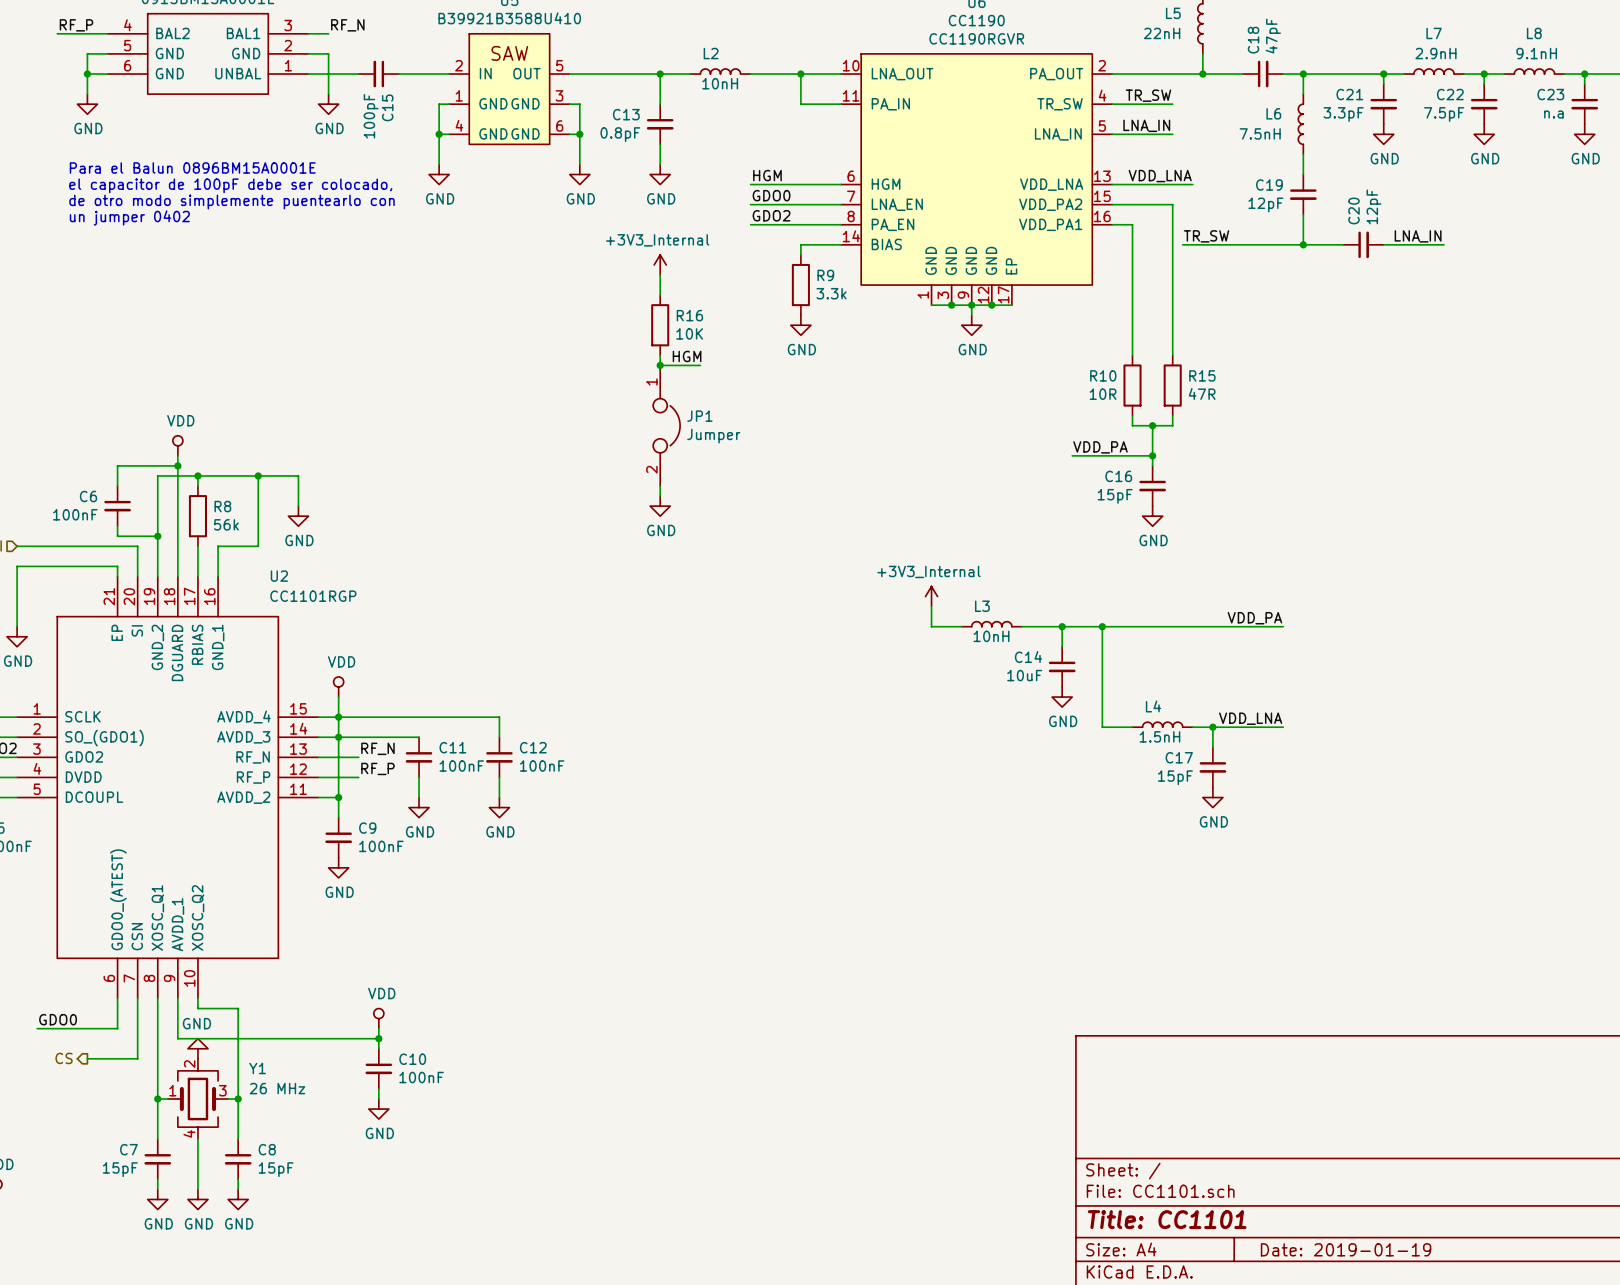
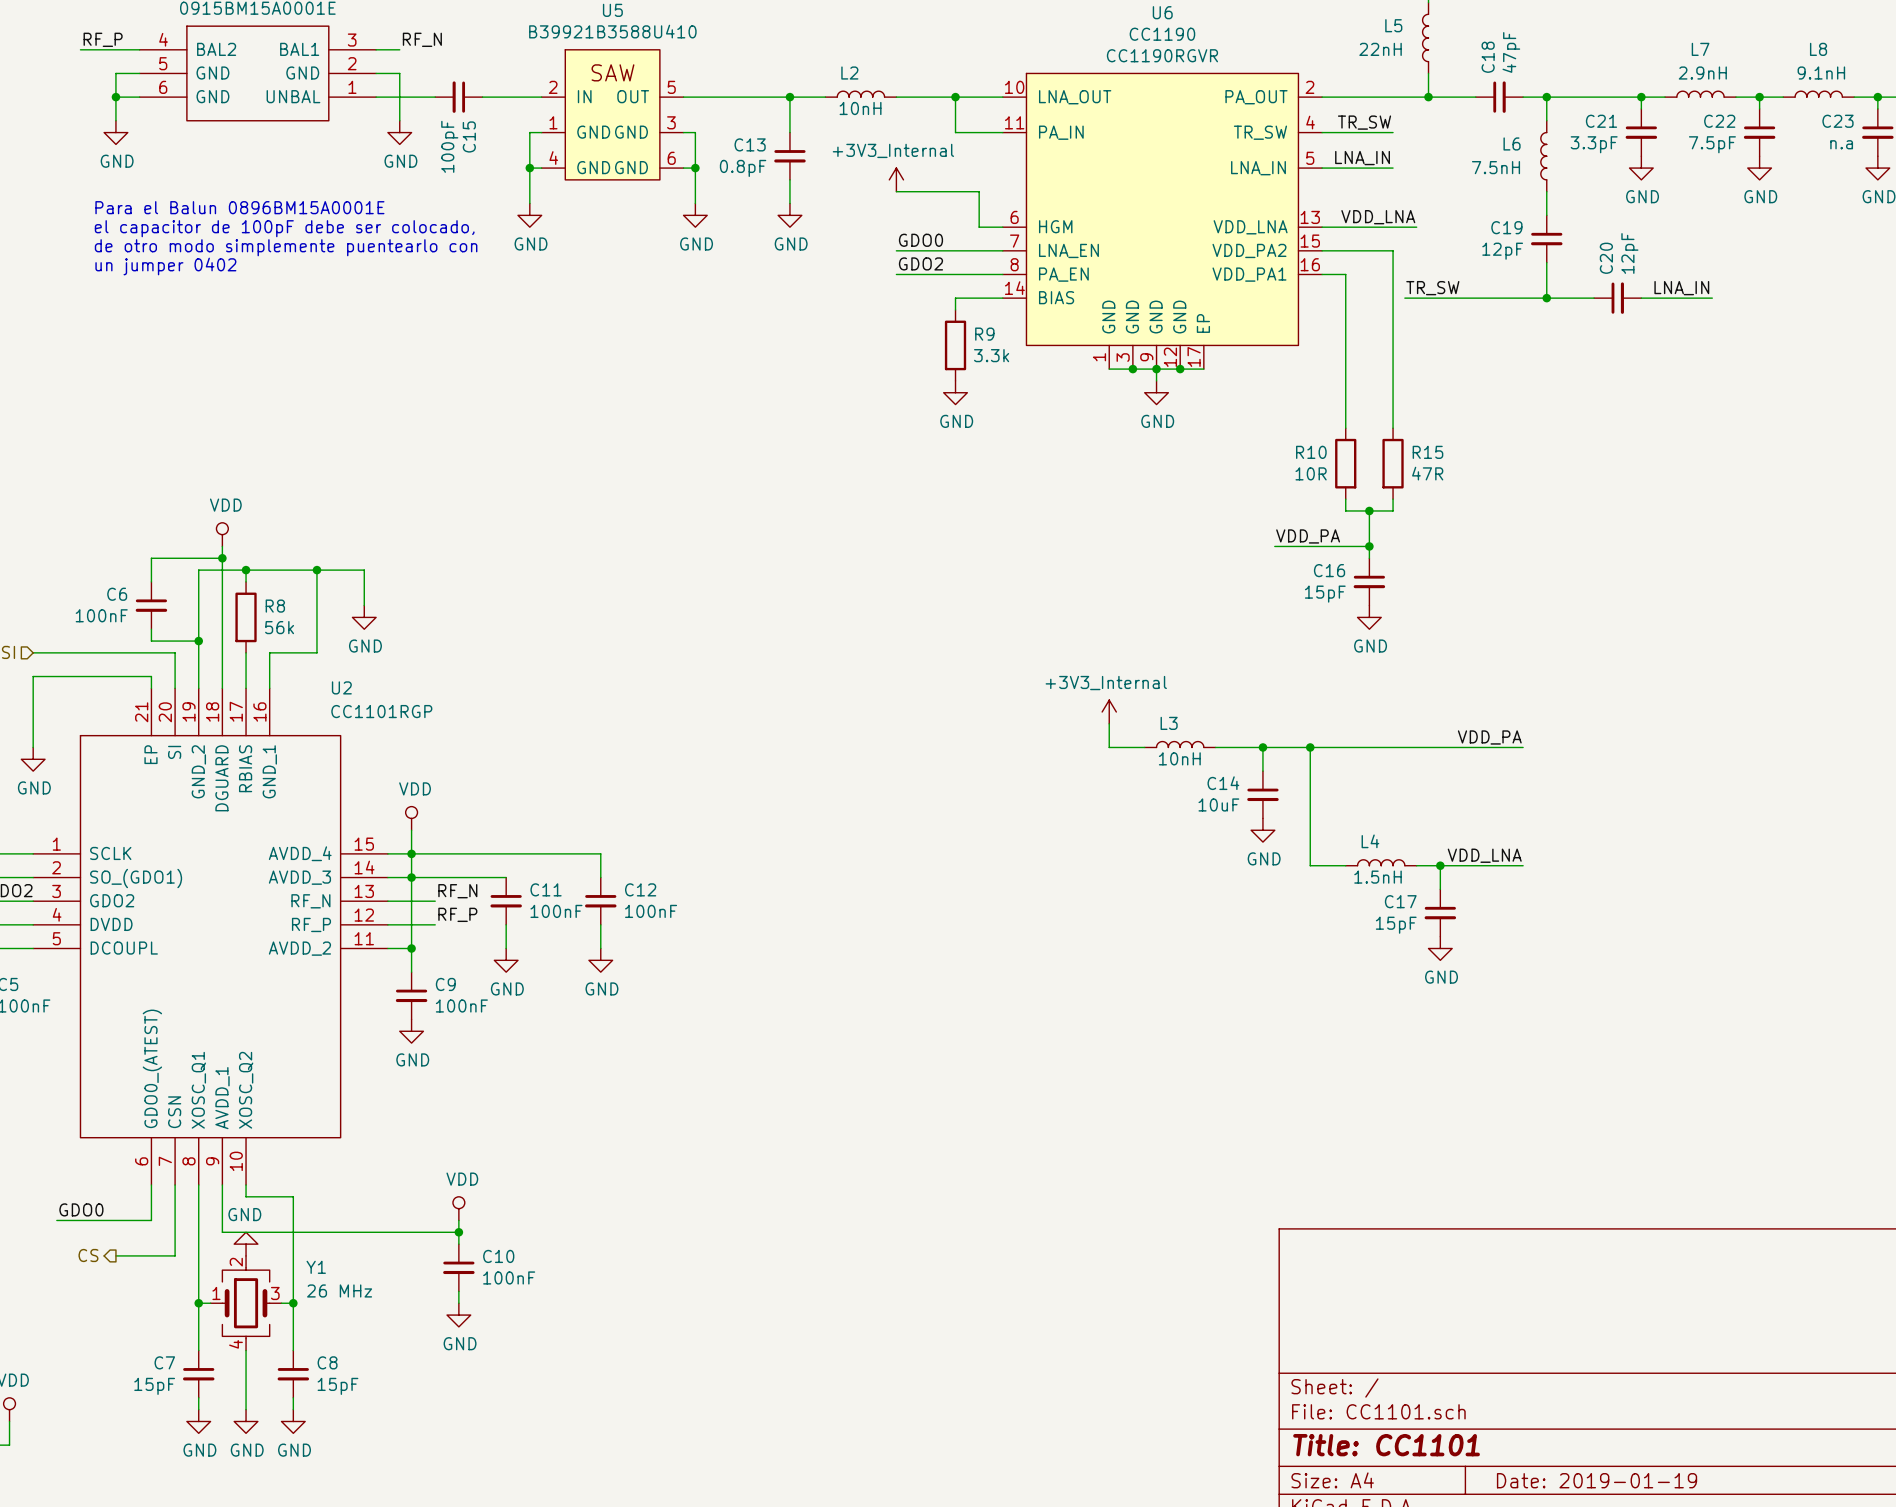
label: HGM (767, 175) -> none
wire: (750, 184) (820, 184) -> (896, 191) (979, 191) (979, 227)
power symbol position: +3V3_Internal (660, 264) -> +3V3_Internal (896, 179)
wire: (660, 274) (660, 295) -> none
R16: 10K (660, 325) -> none
wire: (660, 355) (660, 365) (700, 365) -> none
label: HGM (687, 356) -> none
junction: (660, 365) -> none
JP1: Jumper (666, 425) -> none
wire: (660, 486) (660, 496) -> none
power symbol: GND (660, 506) -> none

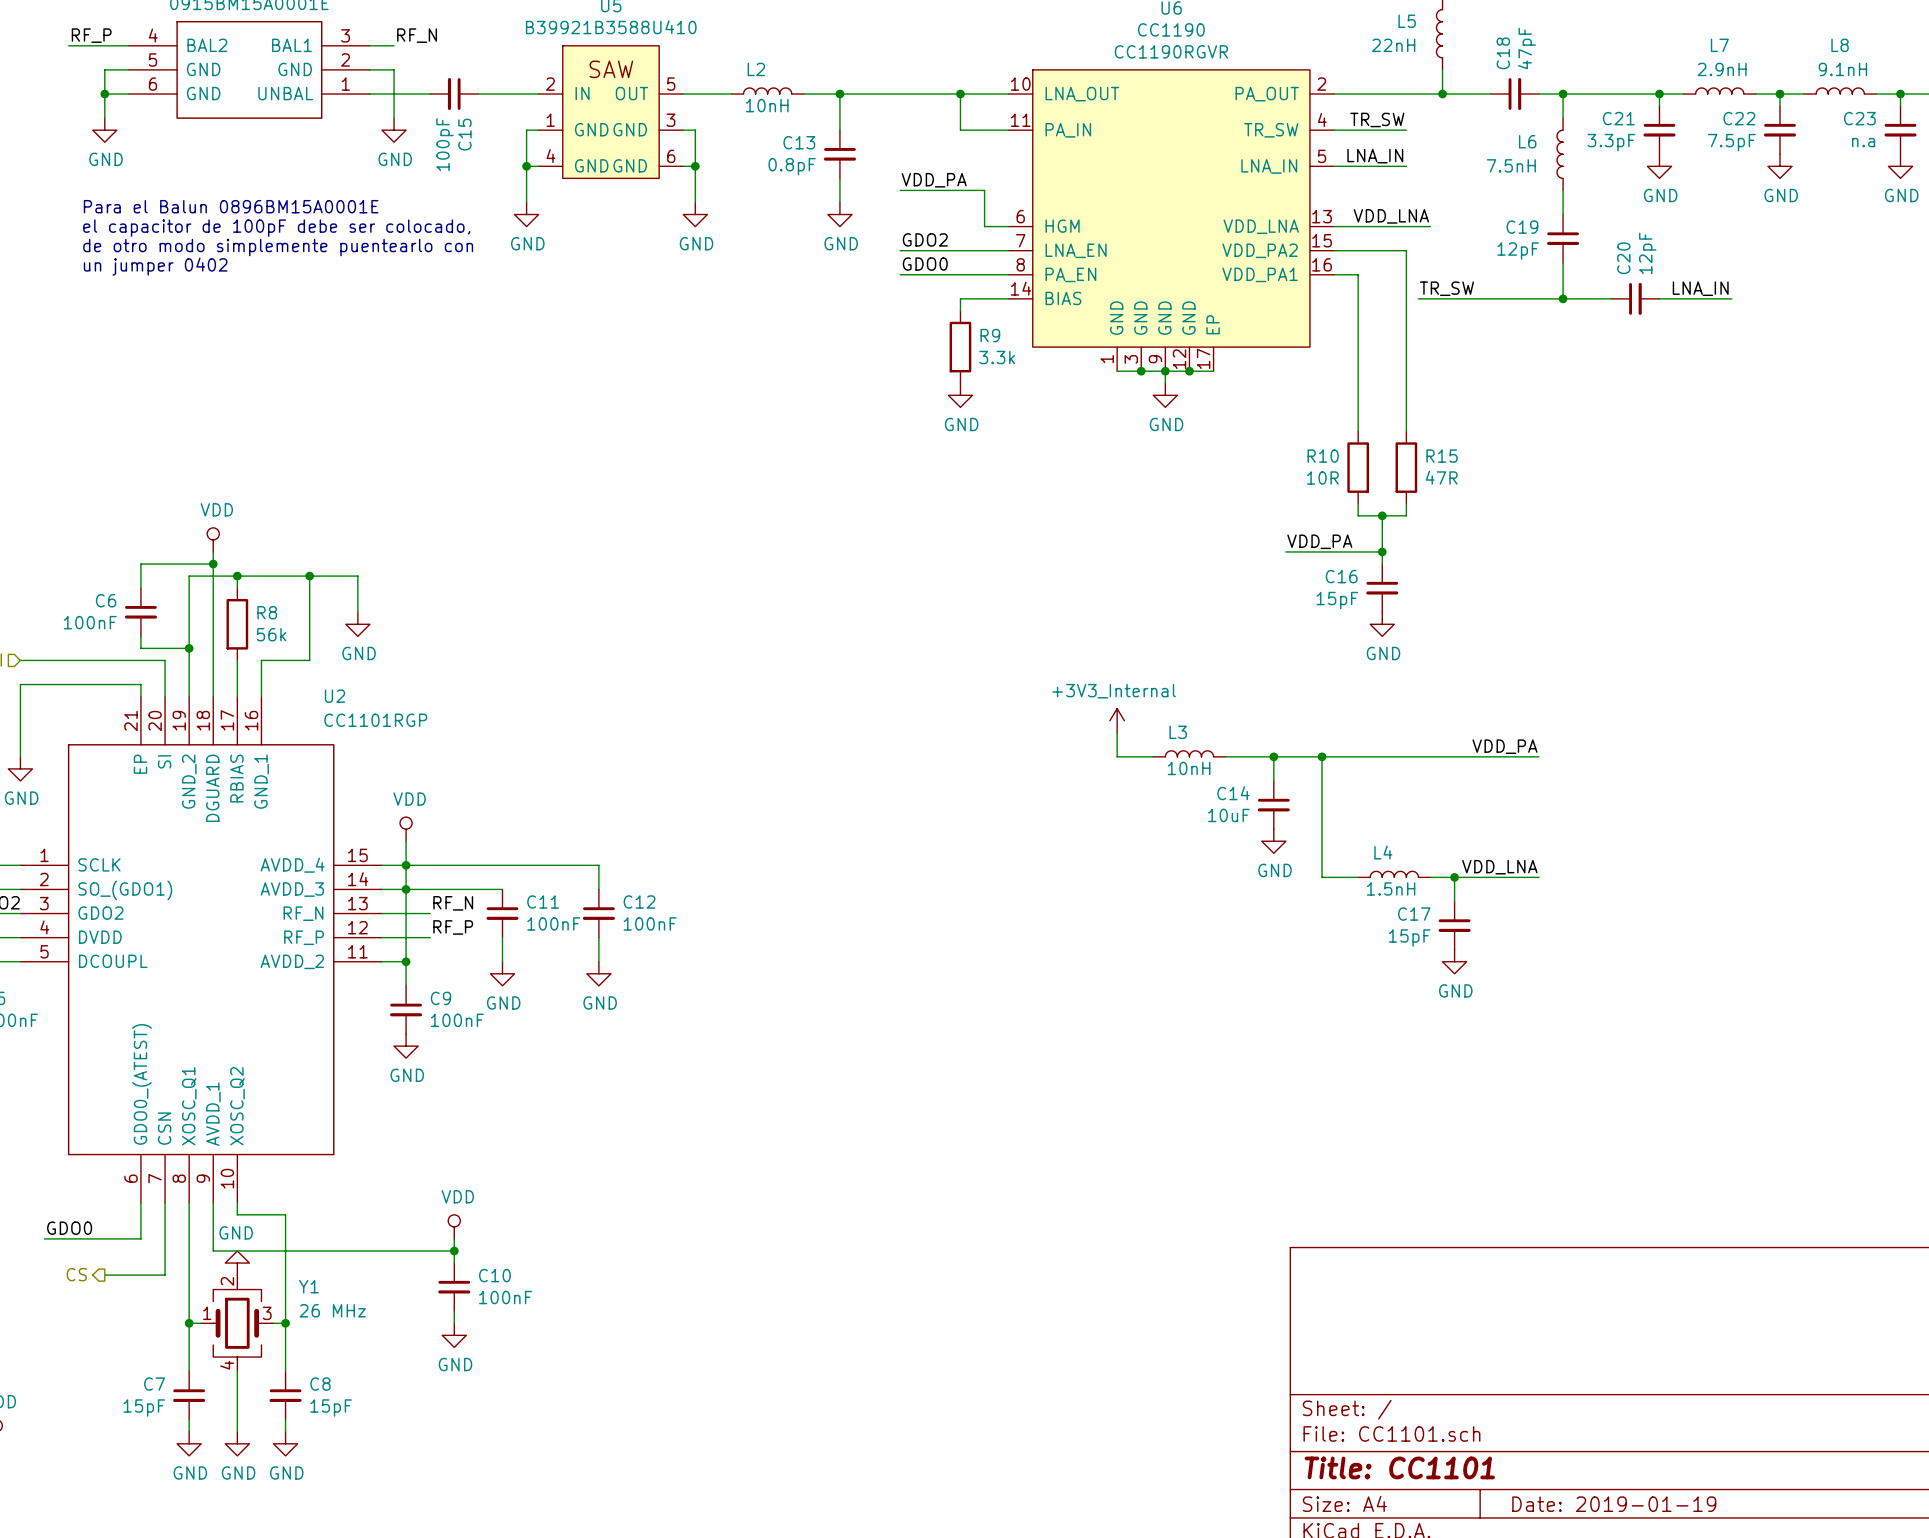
L2 position: (860, 94) -> (767, 90)
wire: (730, 97) (801, 97) -> (827, 94) (900, 94)
wire: (789, 97) (789, 132) -> (839, 94) (839, 130)
junction position: (789, 97) -> (839, 94)
C13 position: (789, 156) -> (839, 154)
wire: (789, 179) (789, 203) -> (839, 178) (839, 202)
power symbol: +3V3_Internal (896, 179) -> none
label: none -> VDD_PA (934, 180)
power symbol position: GND (789, 215) -> GND (839, 214)
label: GDO0 (920, 240) -> GDO2 (925, 239)
label: GDO2 (920, 263) -> GDO0 (925, 264)

